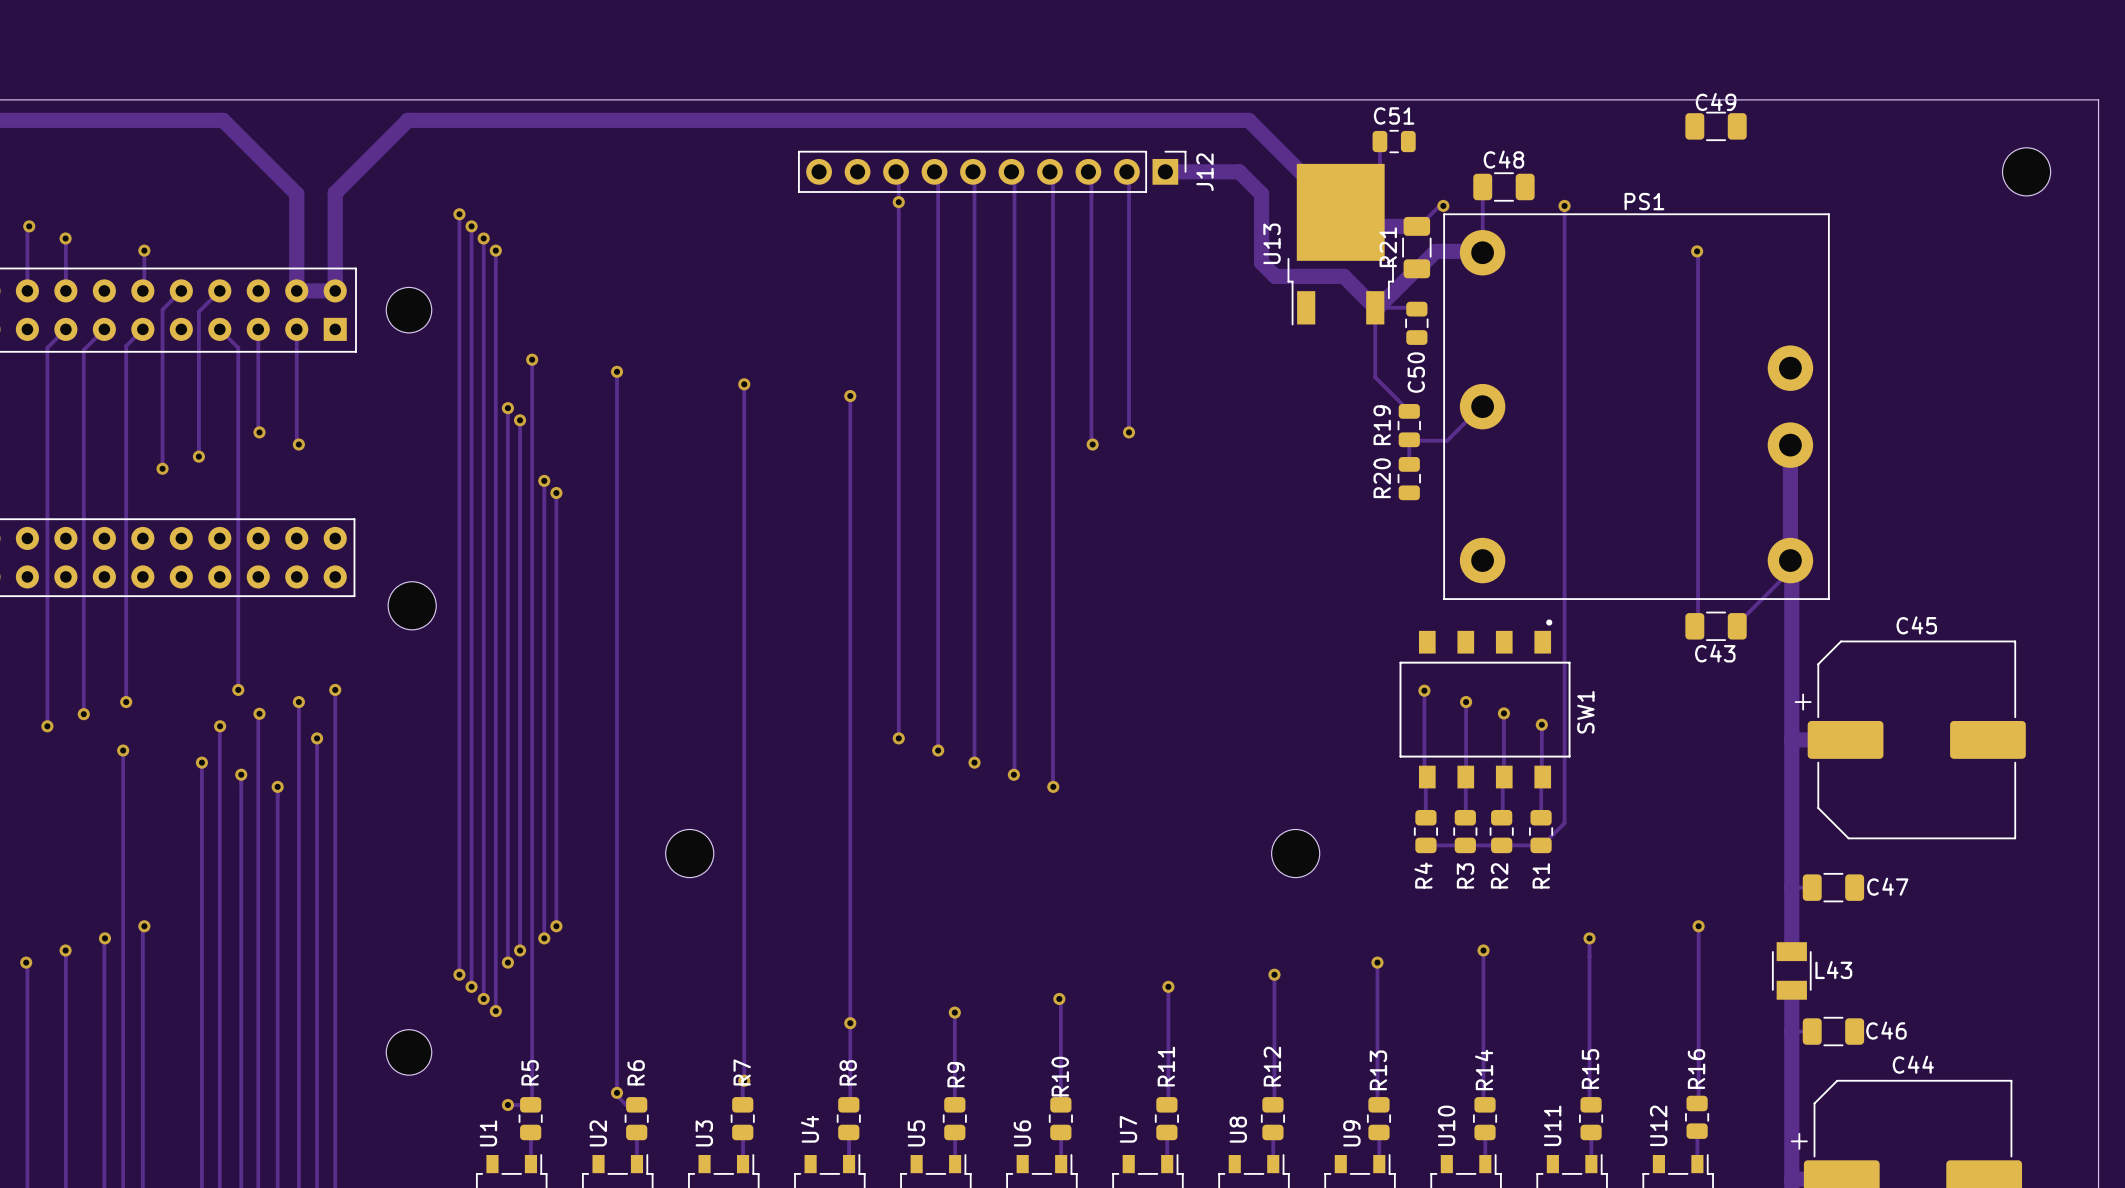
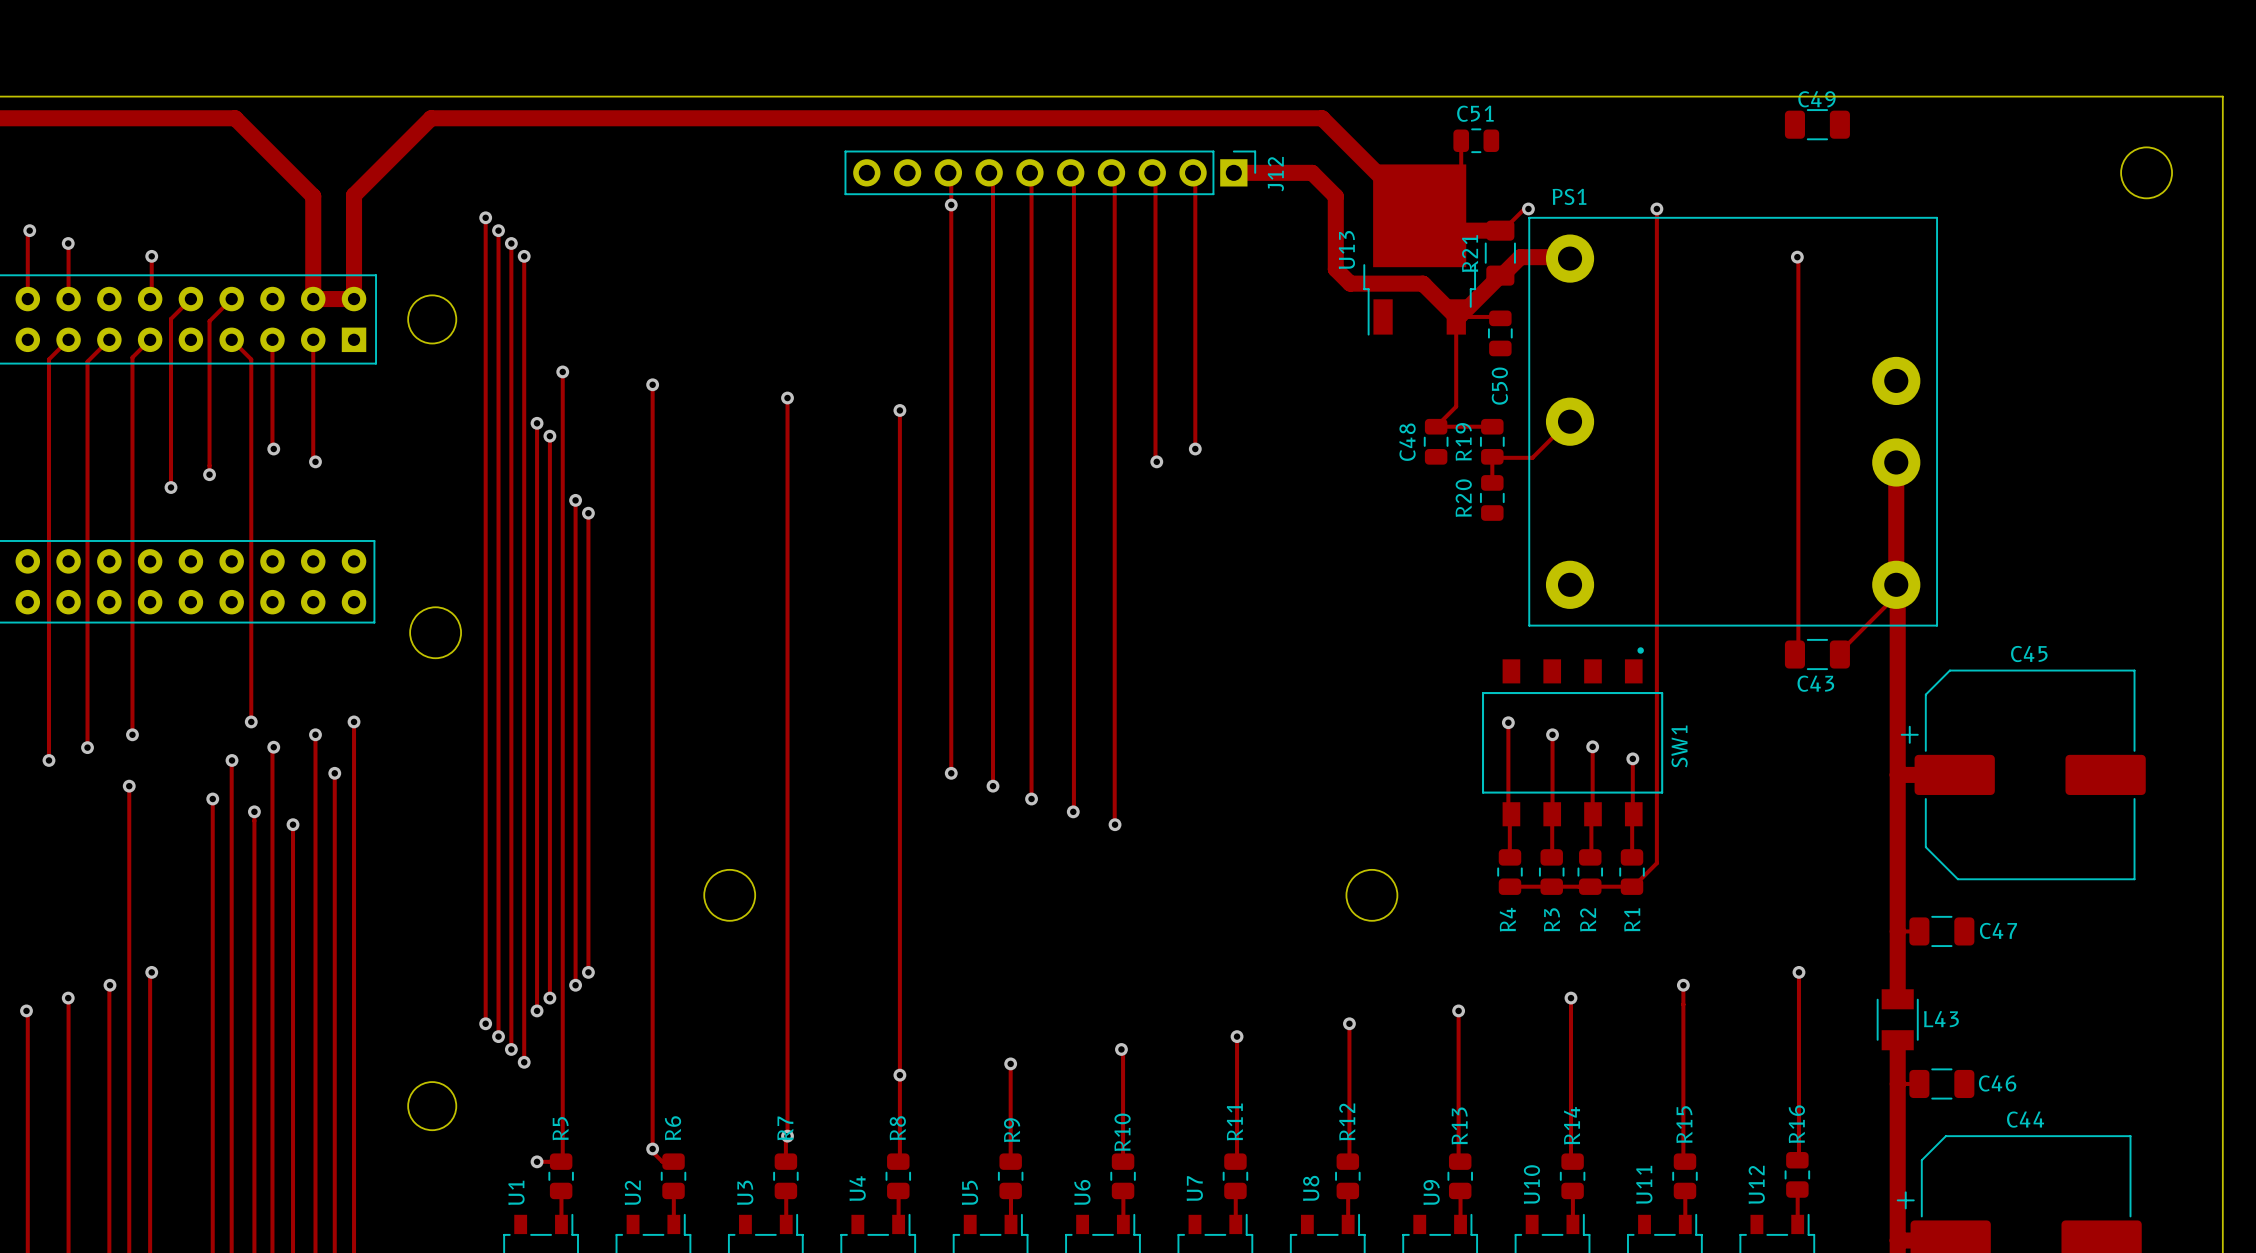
C48 name position: C48 (1503, 159) -> C48 (1407, 442)
C48 footprint: [1473, 172, 1535, 202] -> [1423, 418, 1449, 465]
track: (1482, 186) (1482, 252) -> none
PS1 name position: PS1 (1644, 201) -> PS1 (1569, 196)
track: (1375, 377) (1409, 411) -> (1436, 426) (1492, 426)
track: none -> (1456, 390) (1456, 406) (1437, 425) (1429, 425)

